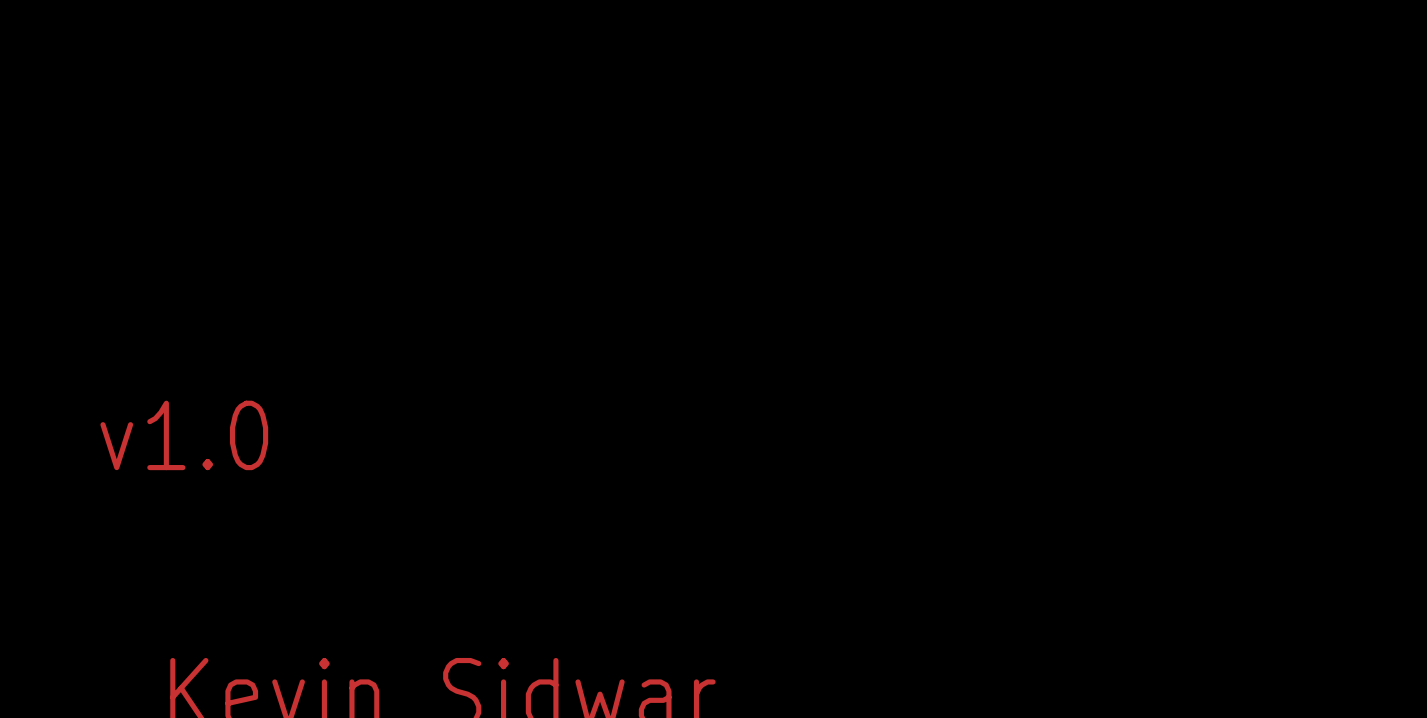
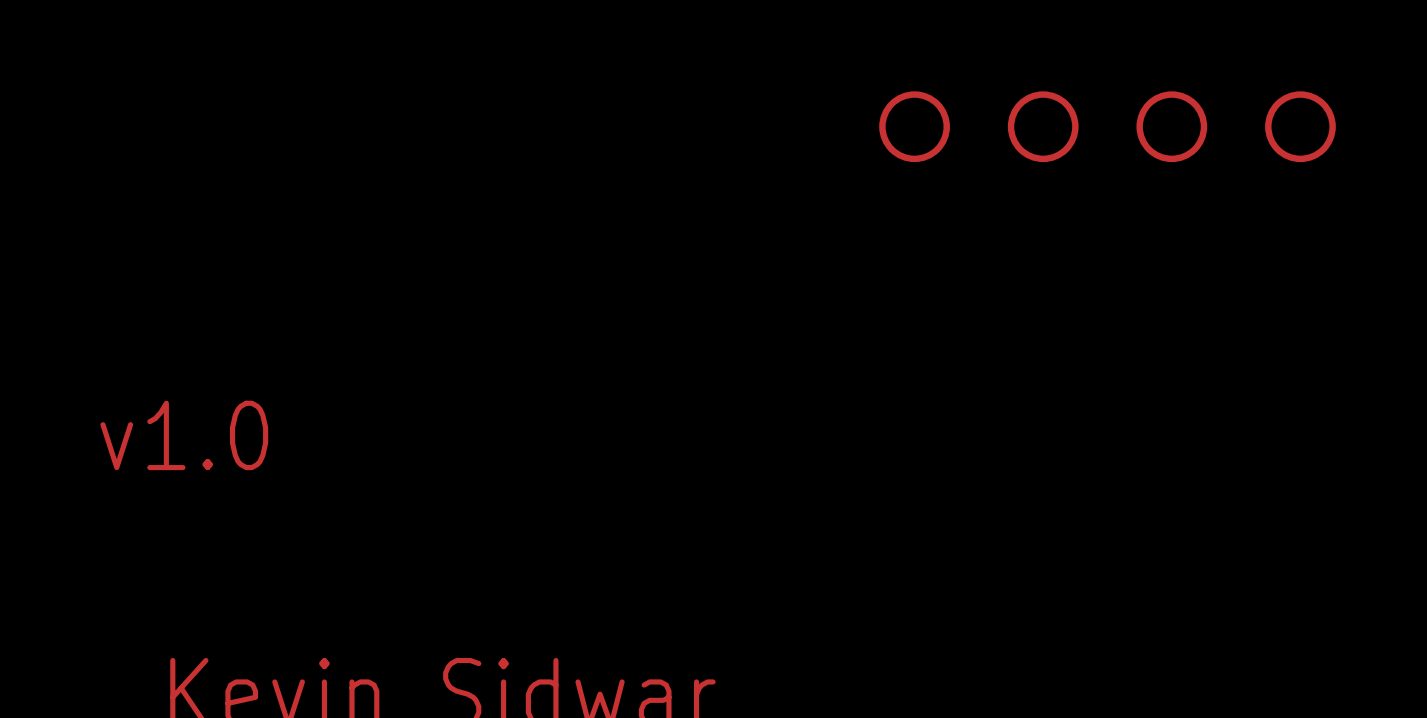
part: none -> (914, 126)
part: none -> (1043, 126)
part: none -> (1171, 126)
part: none -> (1300, 126)

